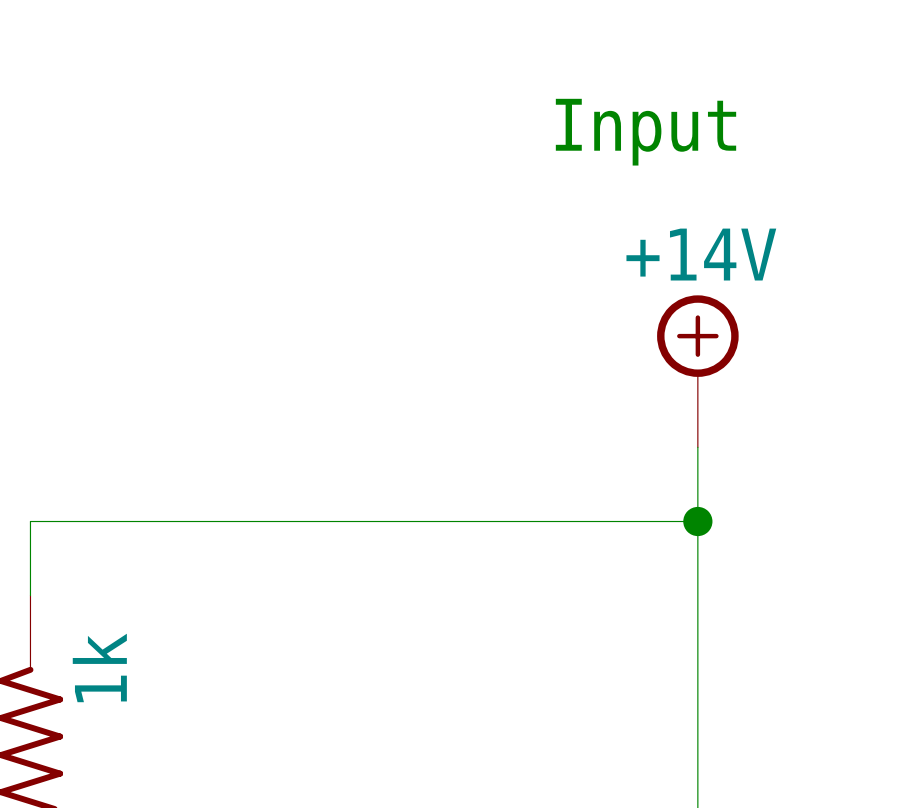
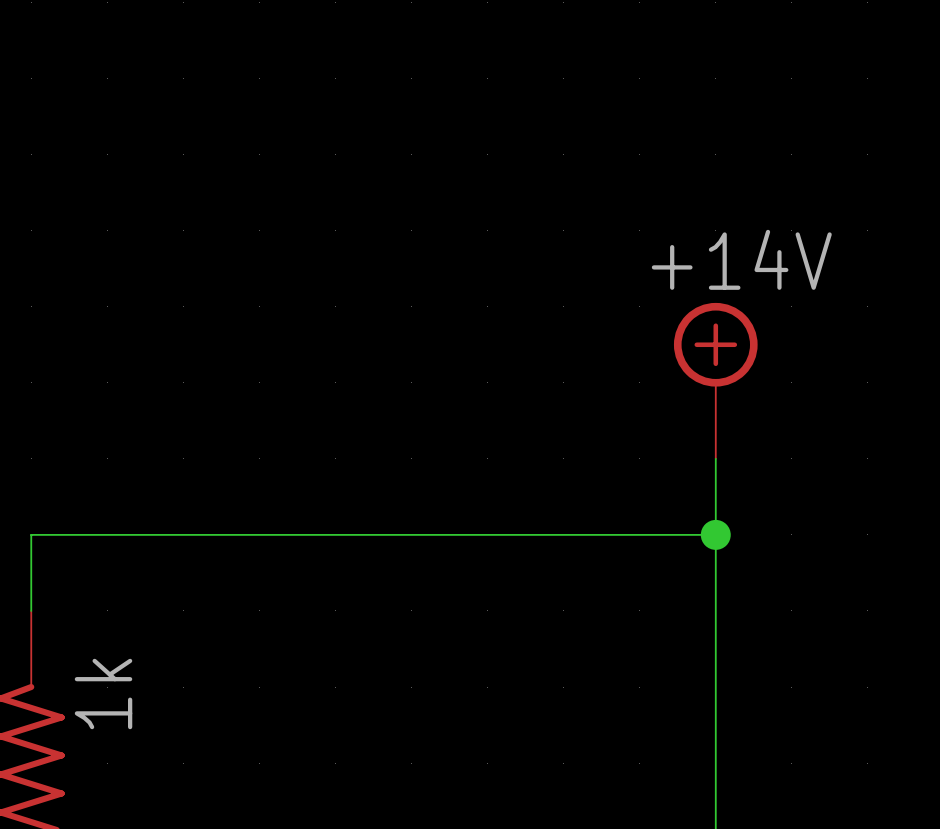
text: Input (646, 132) -> none

